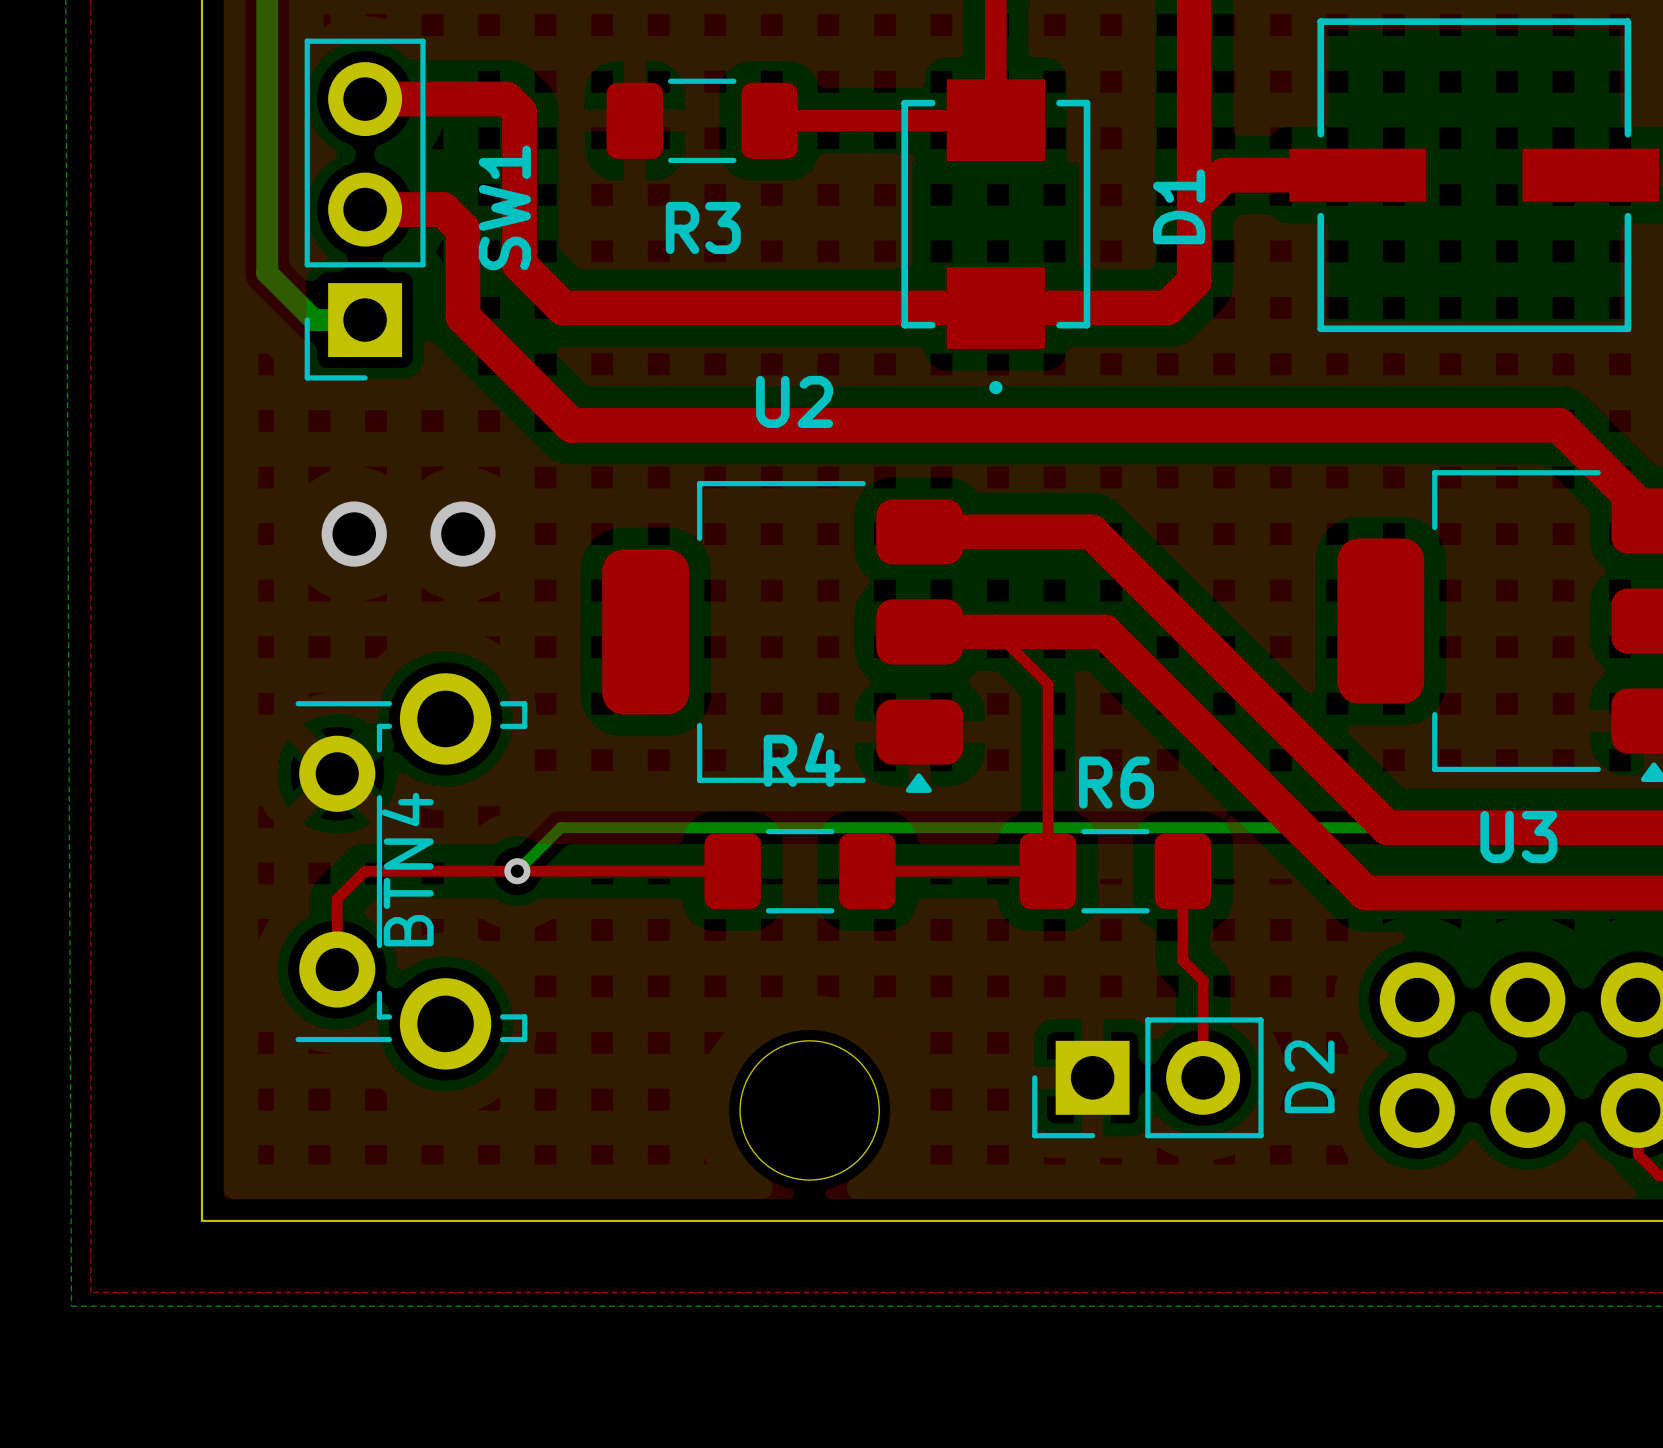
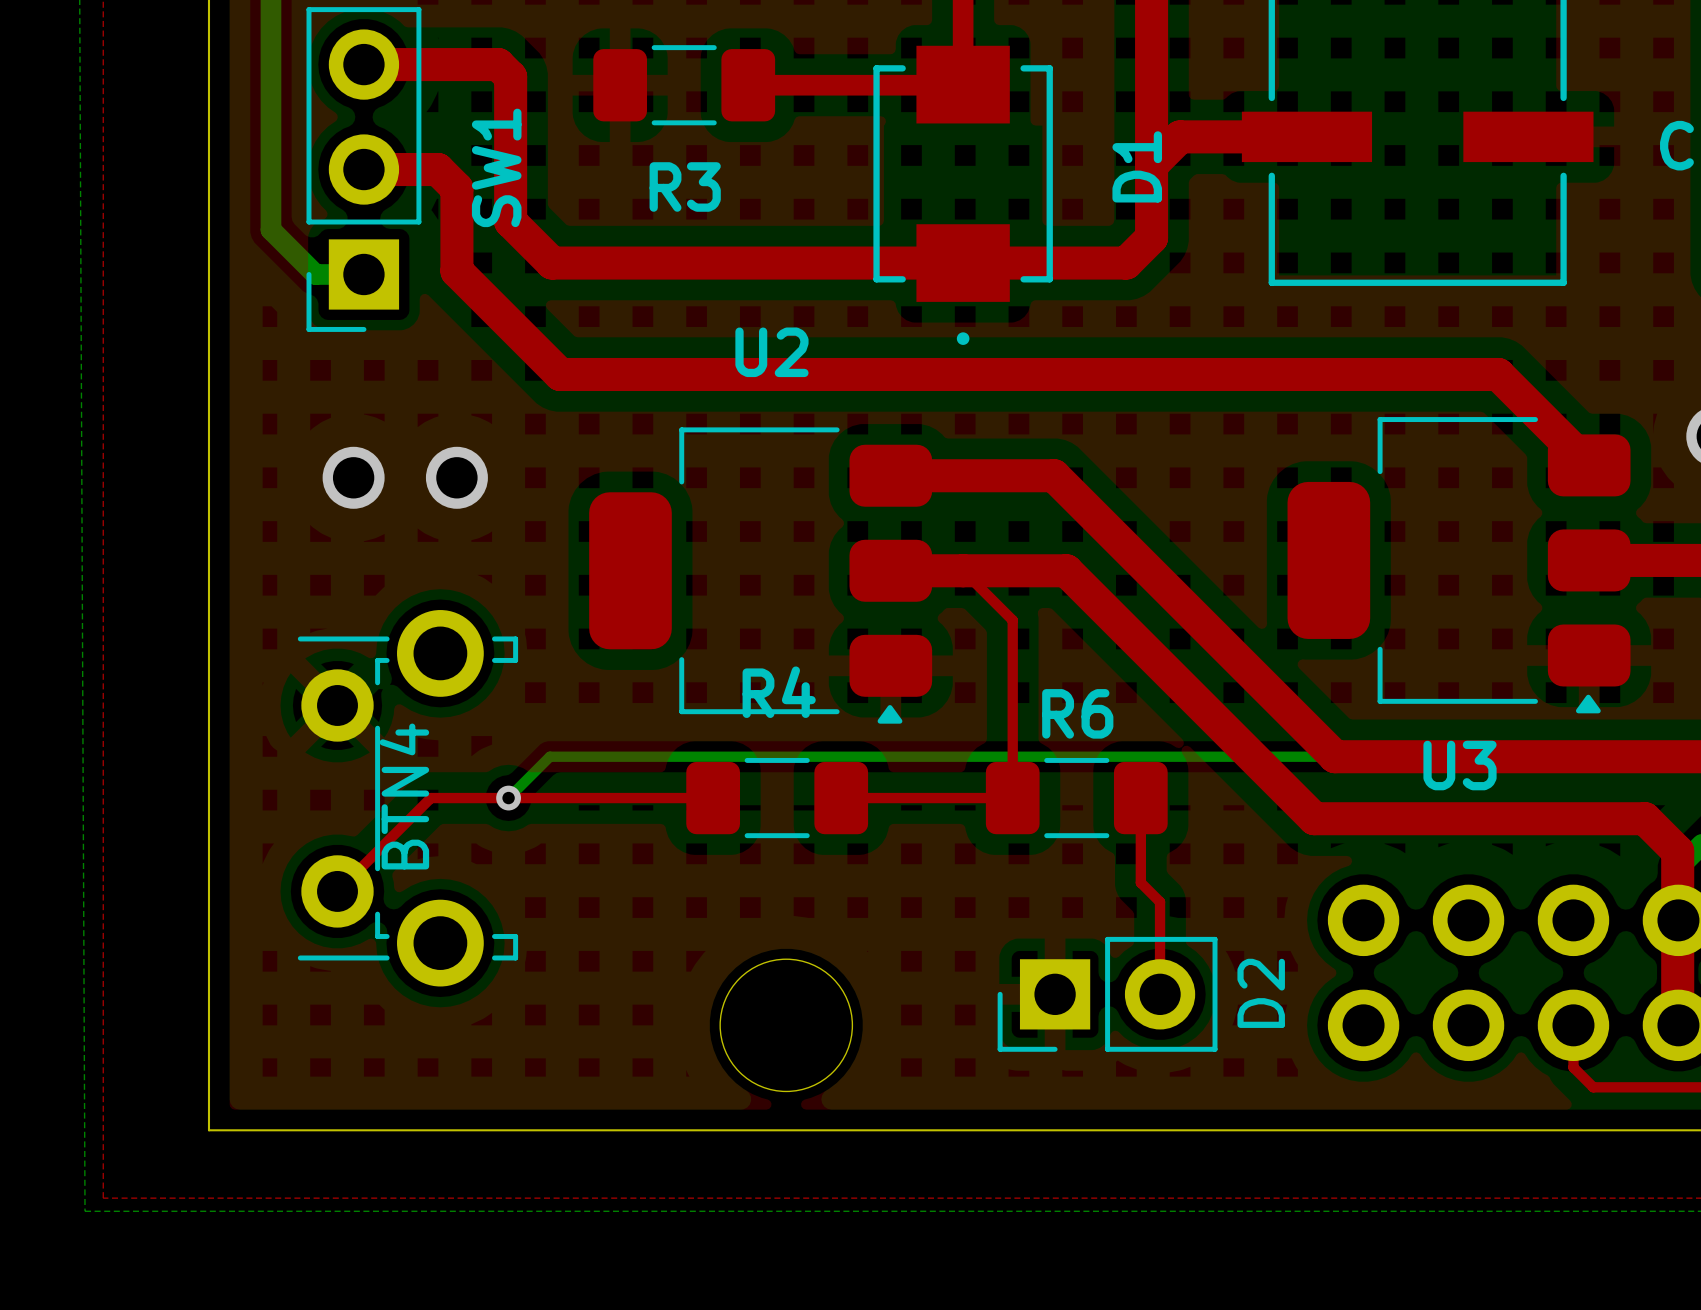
top track: (435, 871) (365, 871) (337, 899) (337, 969) -> (430, 798) (337, 891)

